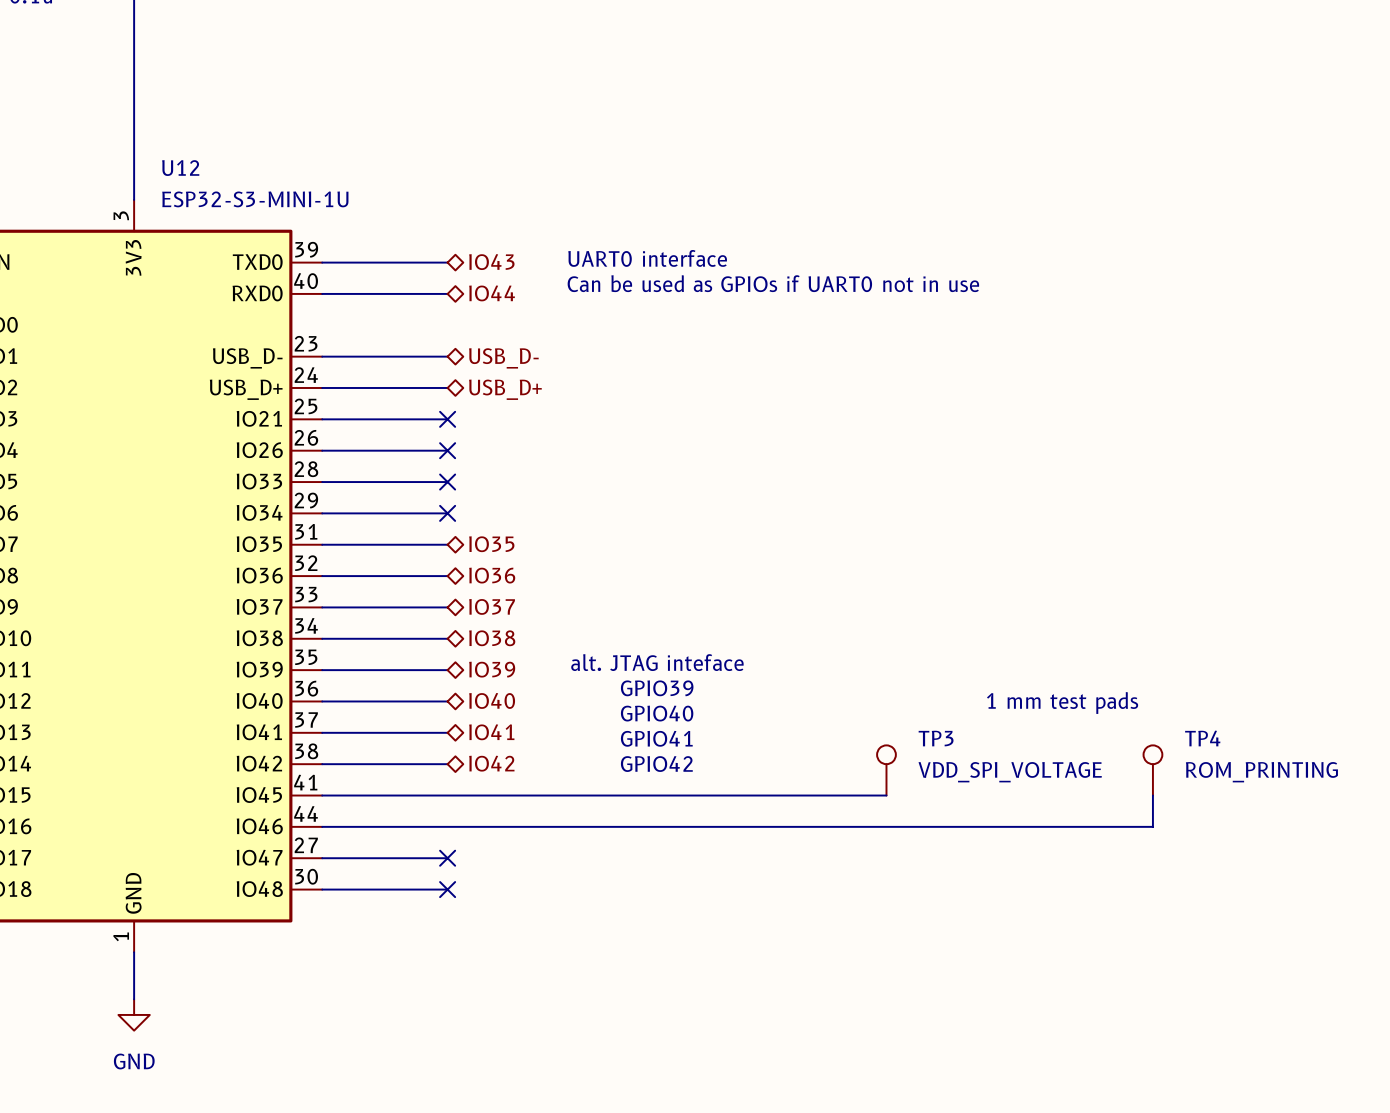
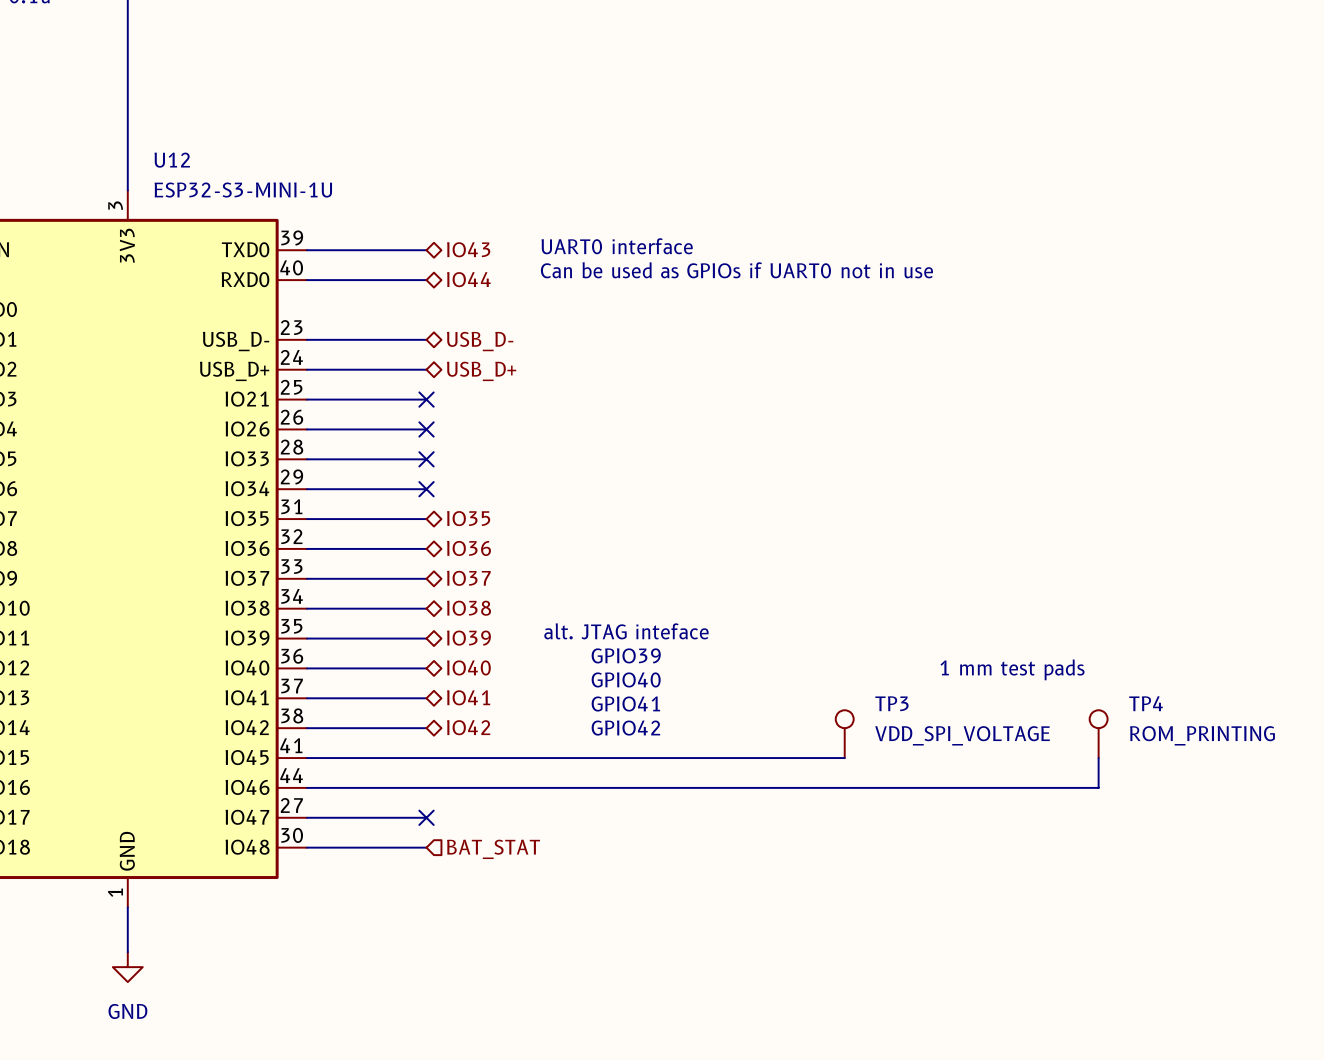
no-connect mark: (447, 889) -> none
hierarchical label: none -> BAT_STAT (493, 849)

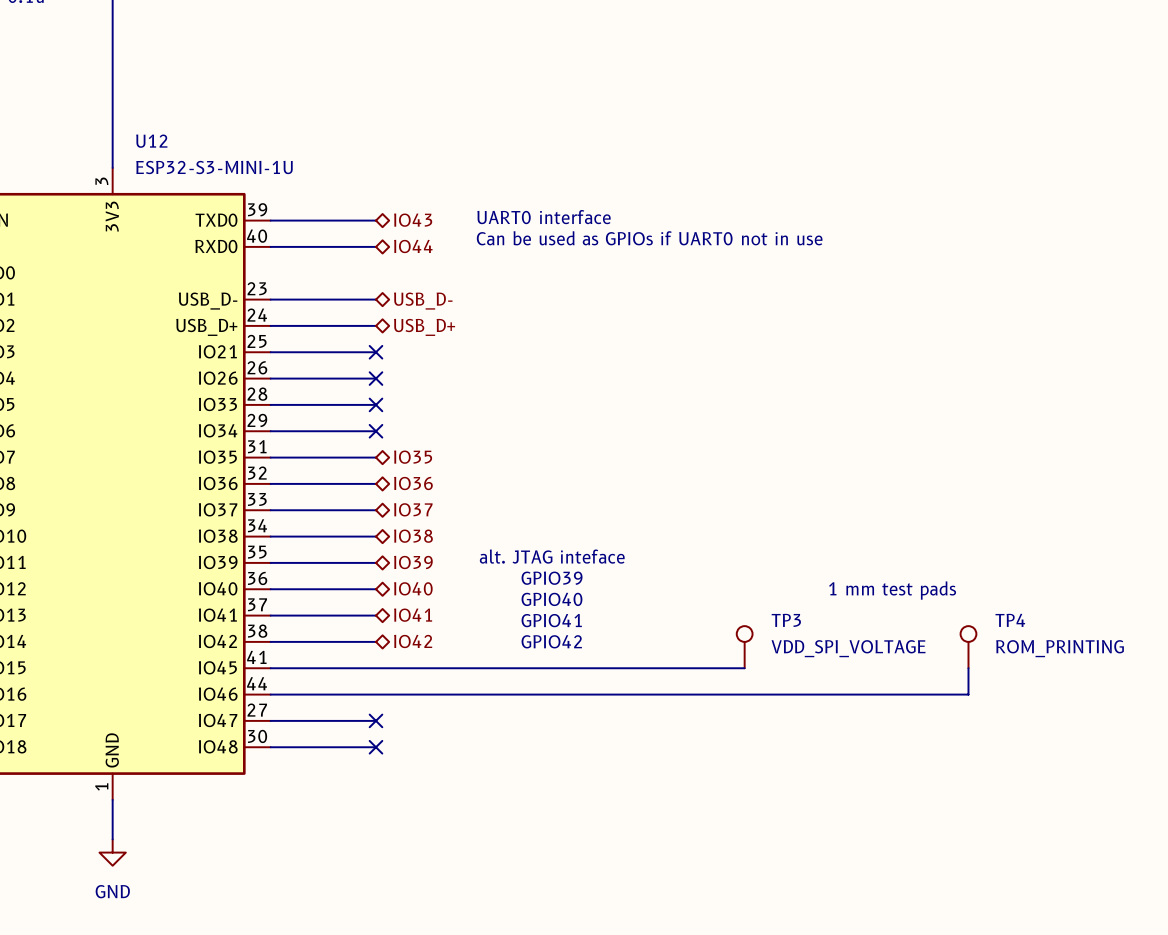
no-connect mark: none -> (375, 747)
hierarchical label: BAT_STAT (493, 849) -> none

